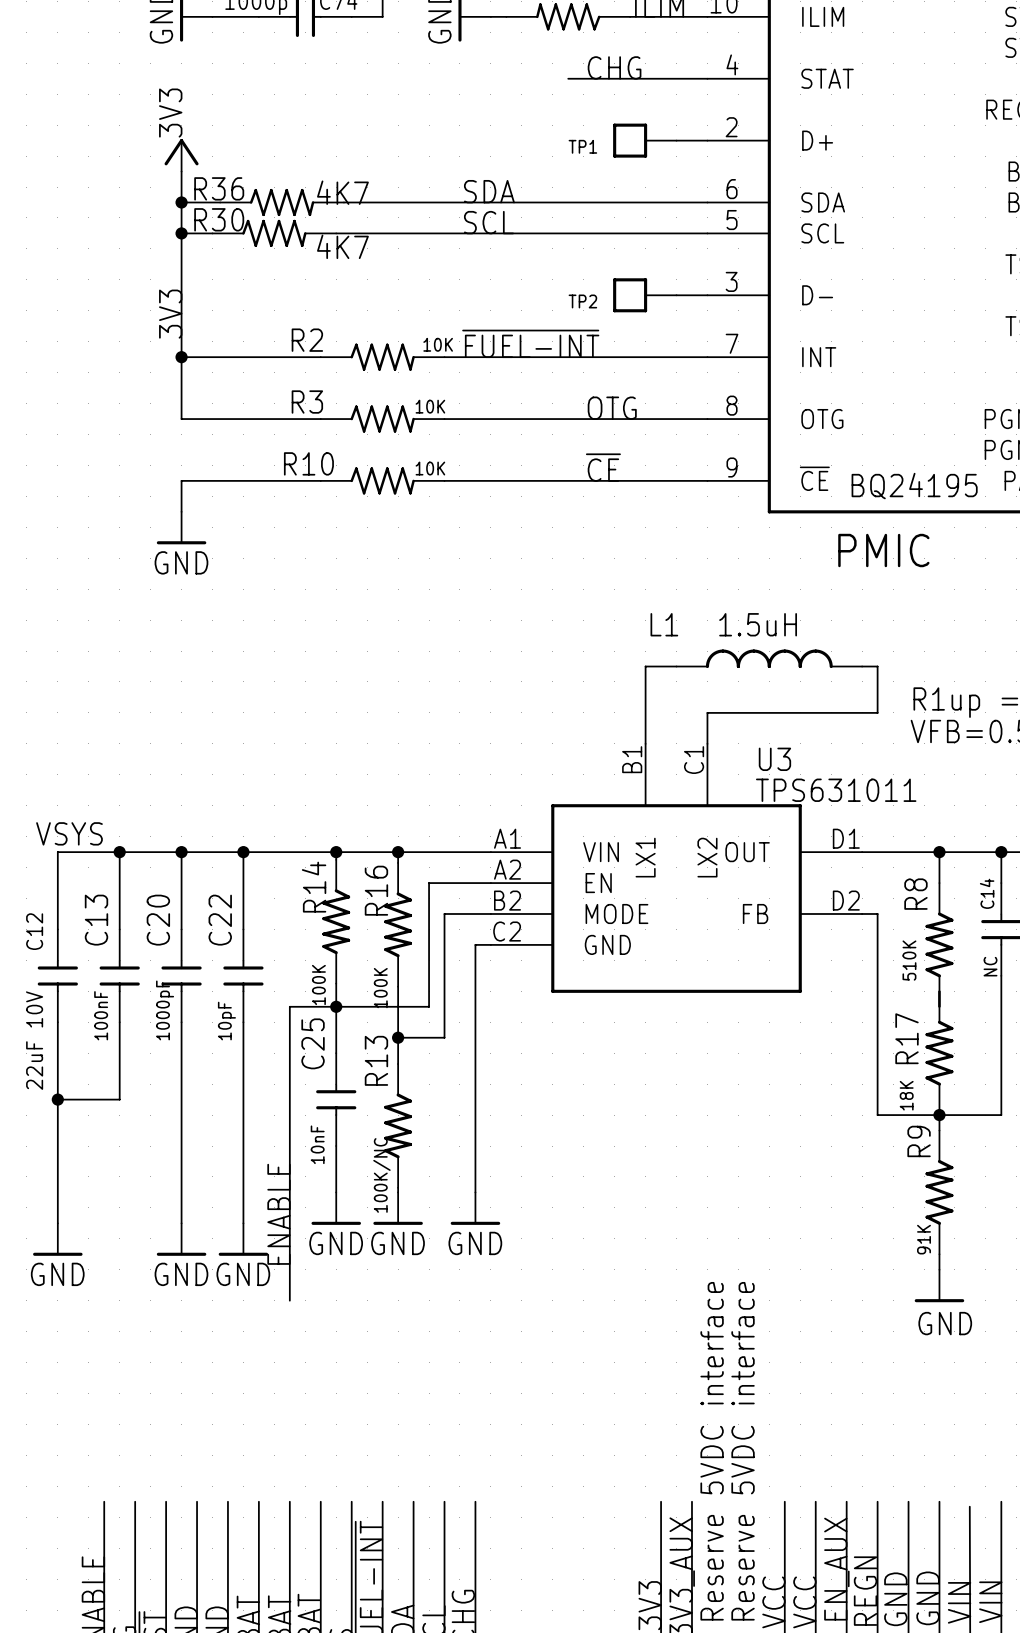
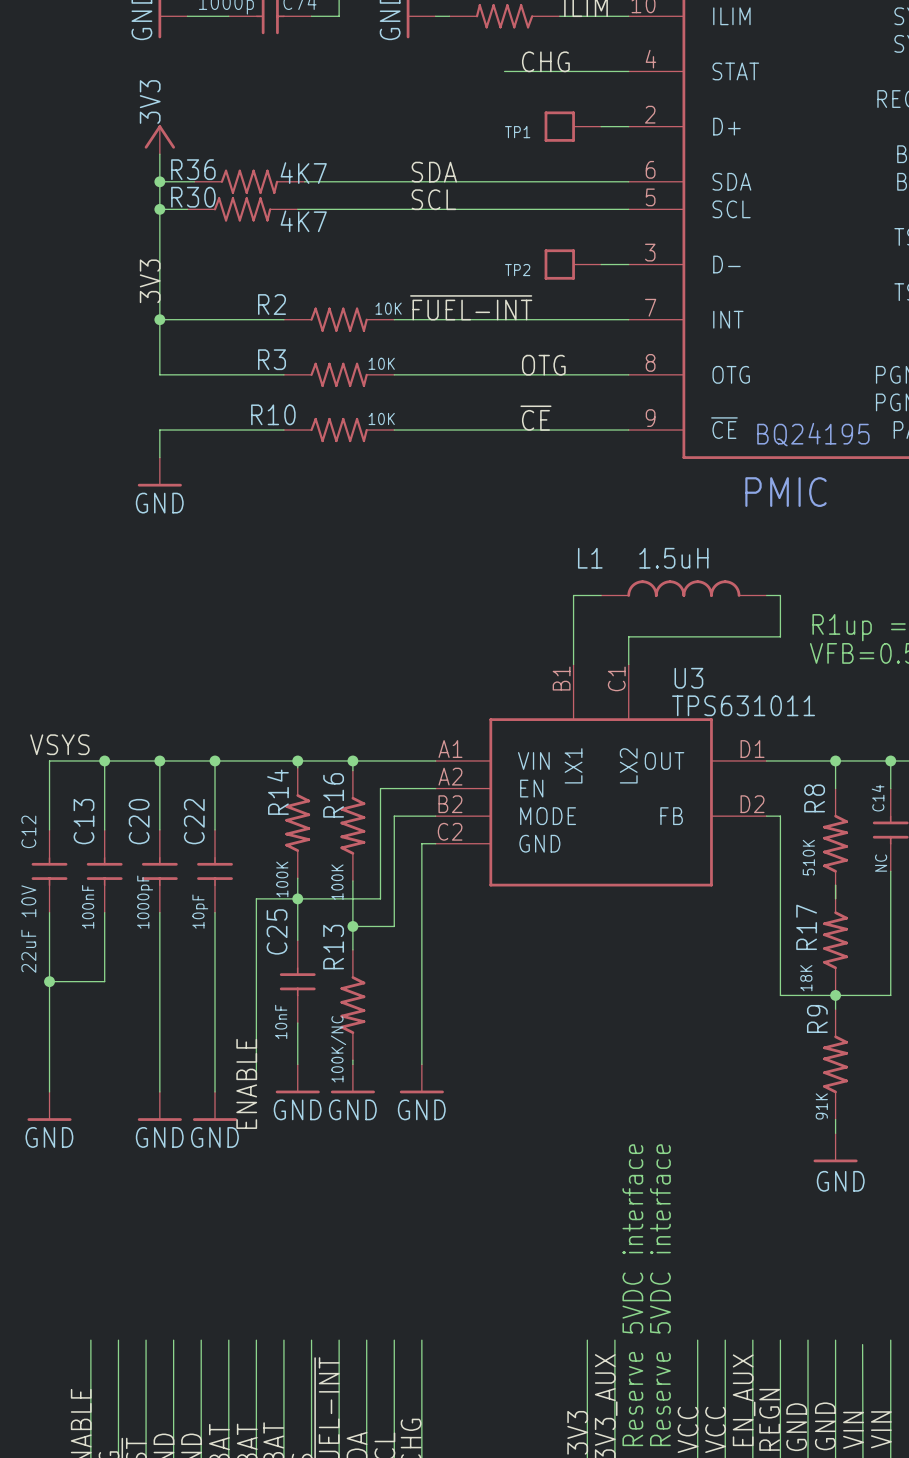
wire: (289, 1207) (289, 1300) -> none

